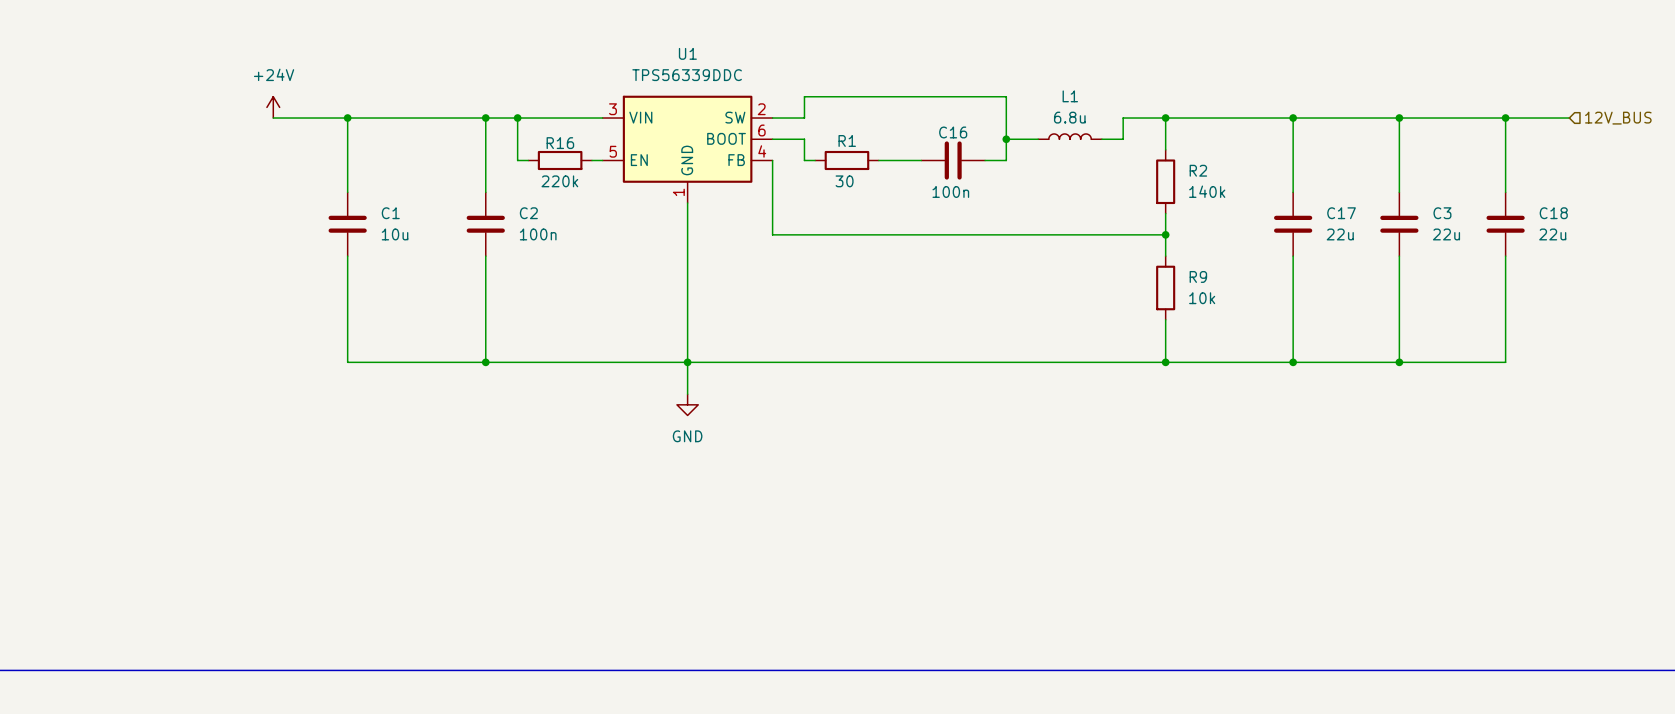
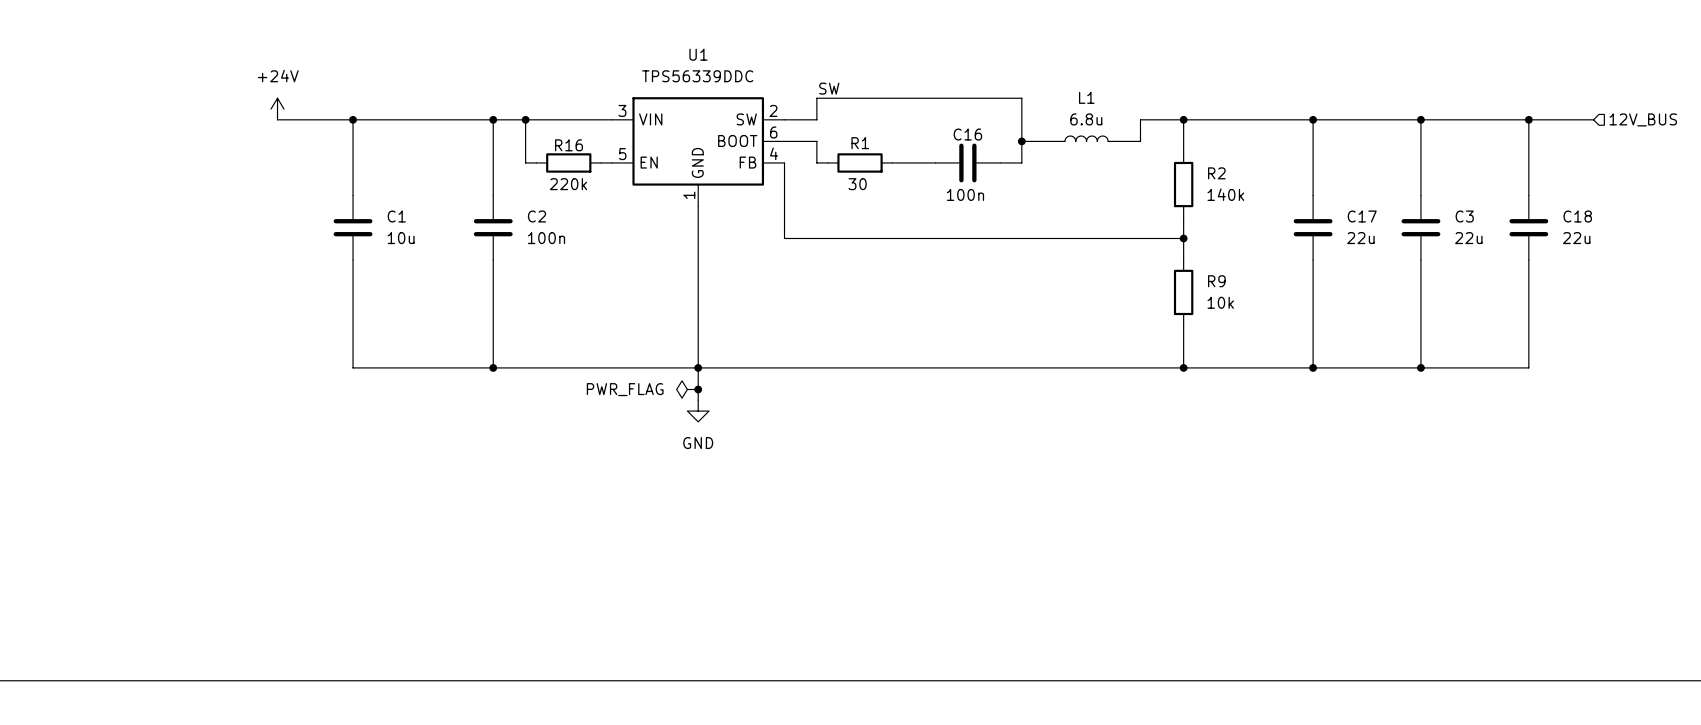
label: none -> SW (829, 88)
power symbol: none -> PWR_FLAG (687, 389)
junction: none -> (698, 389)

